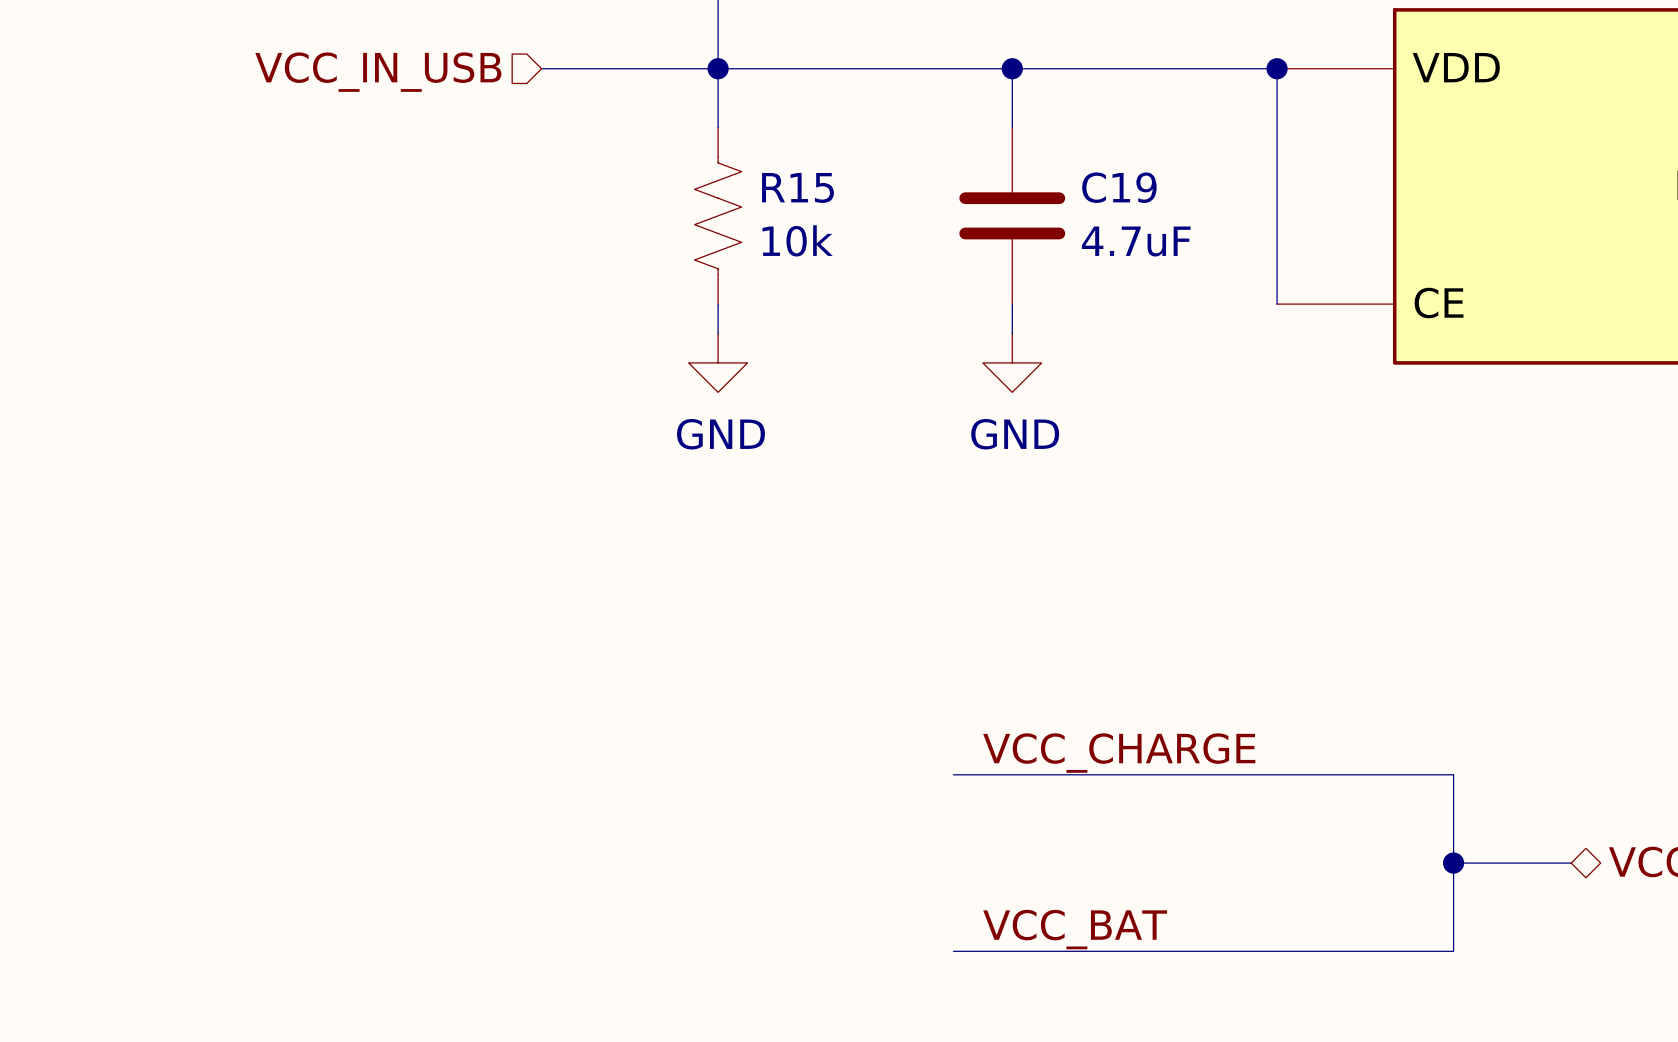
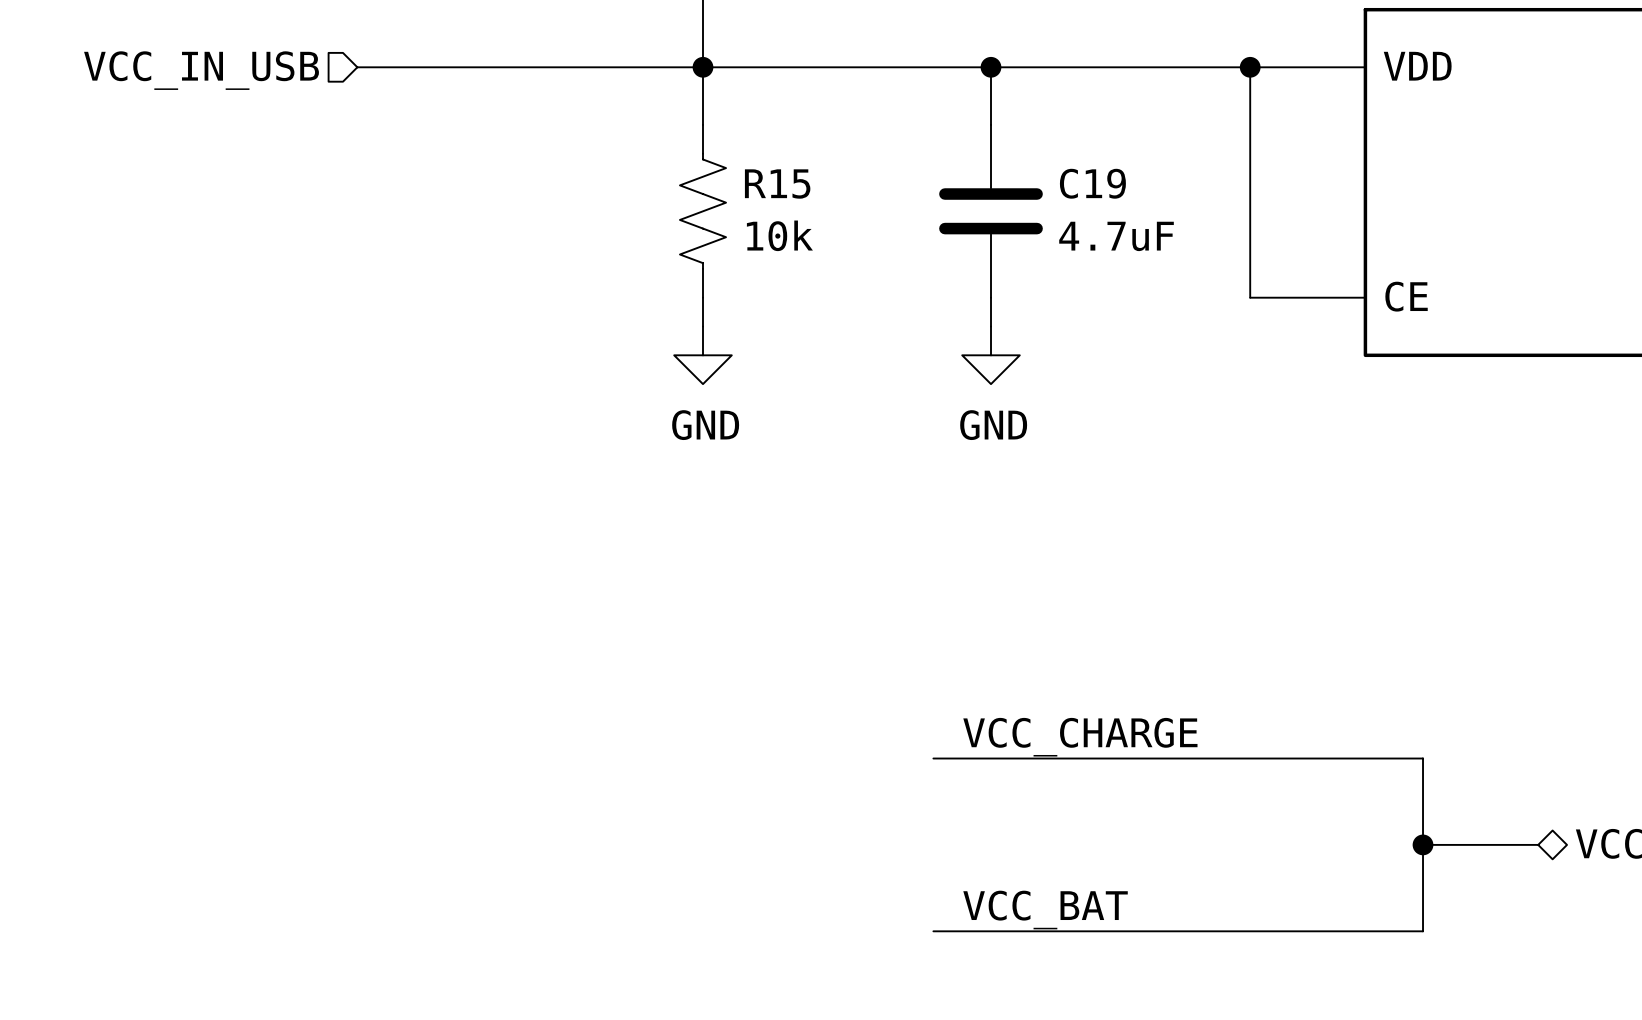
wire: none -> (357, 67) (530, 67)
hierarchical label position: VCC_IN_USB (378, 72) -> VCC_IN_USB (201, 70)

